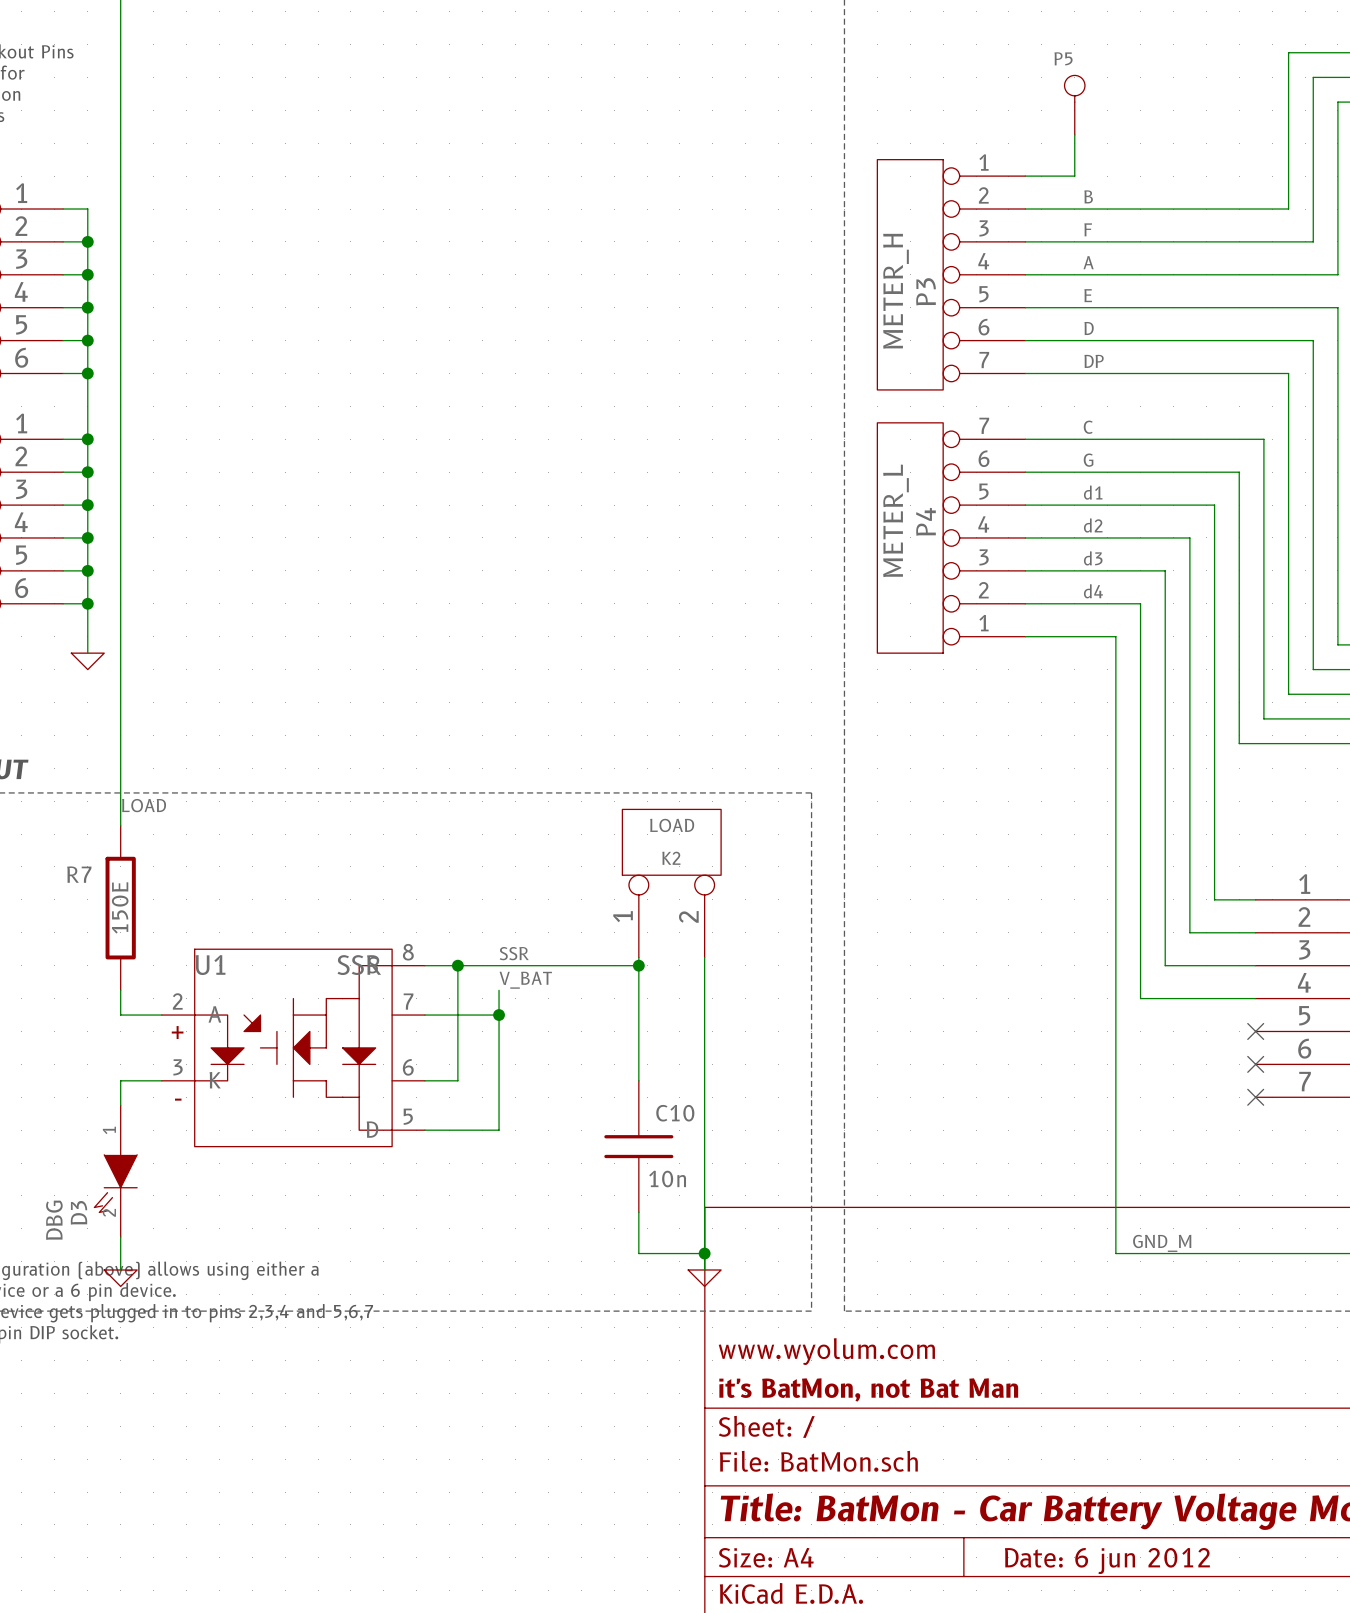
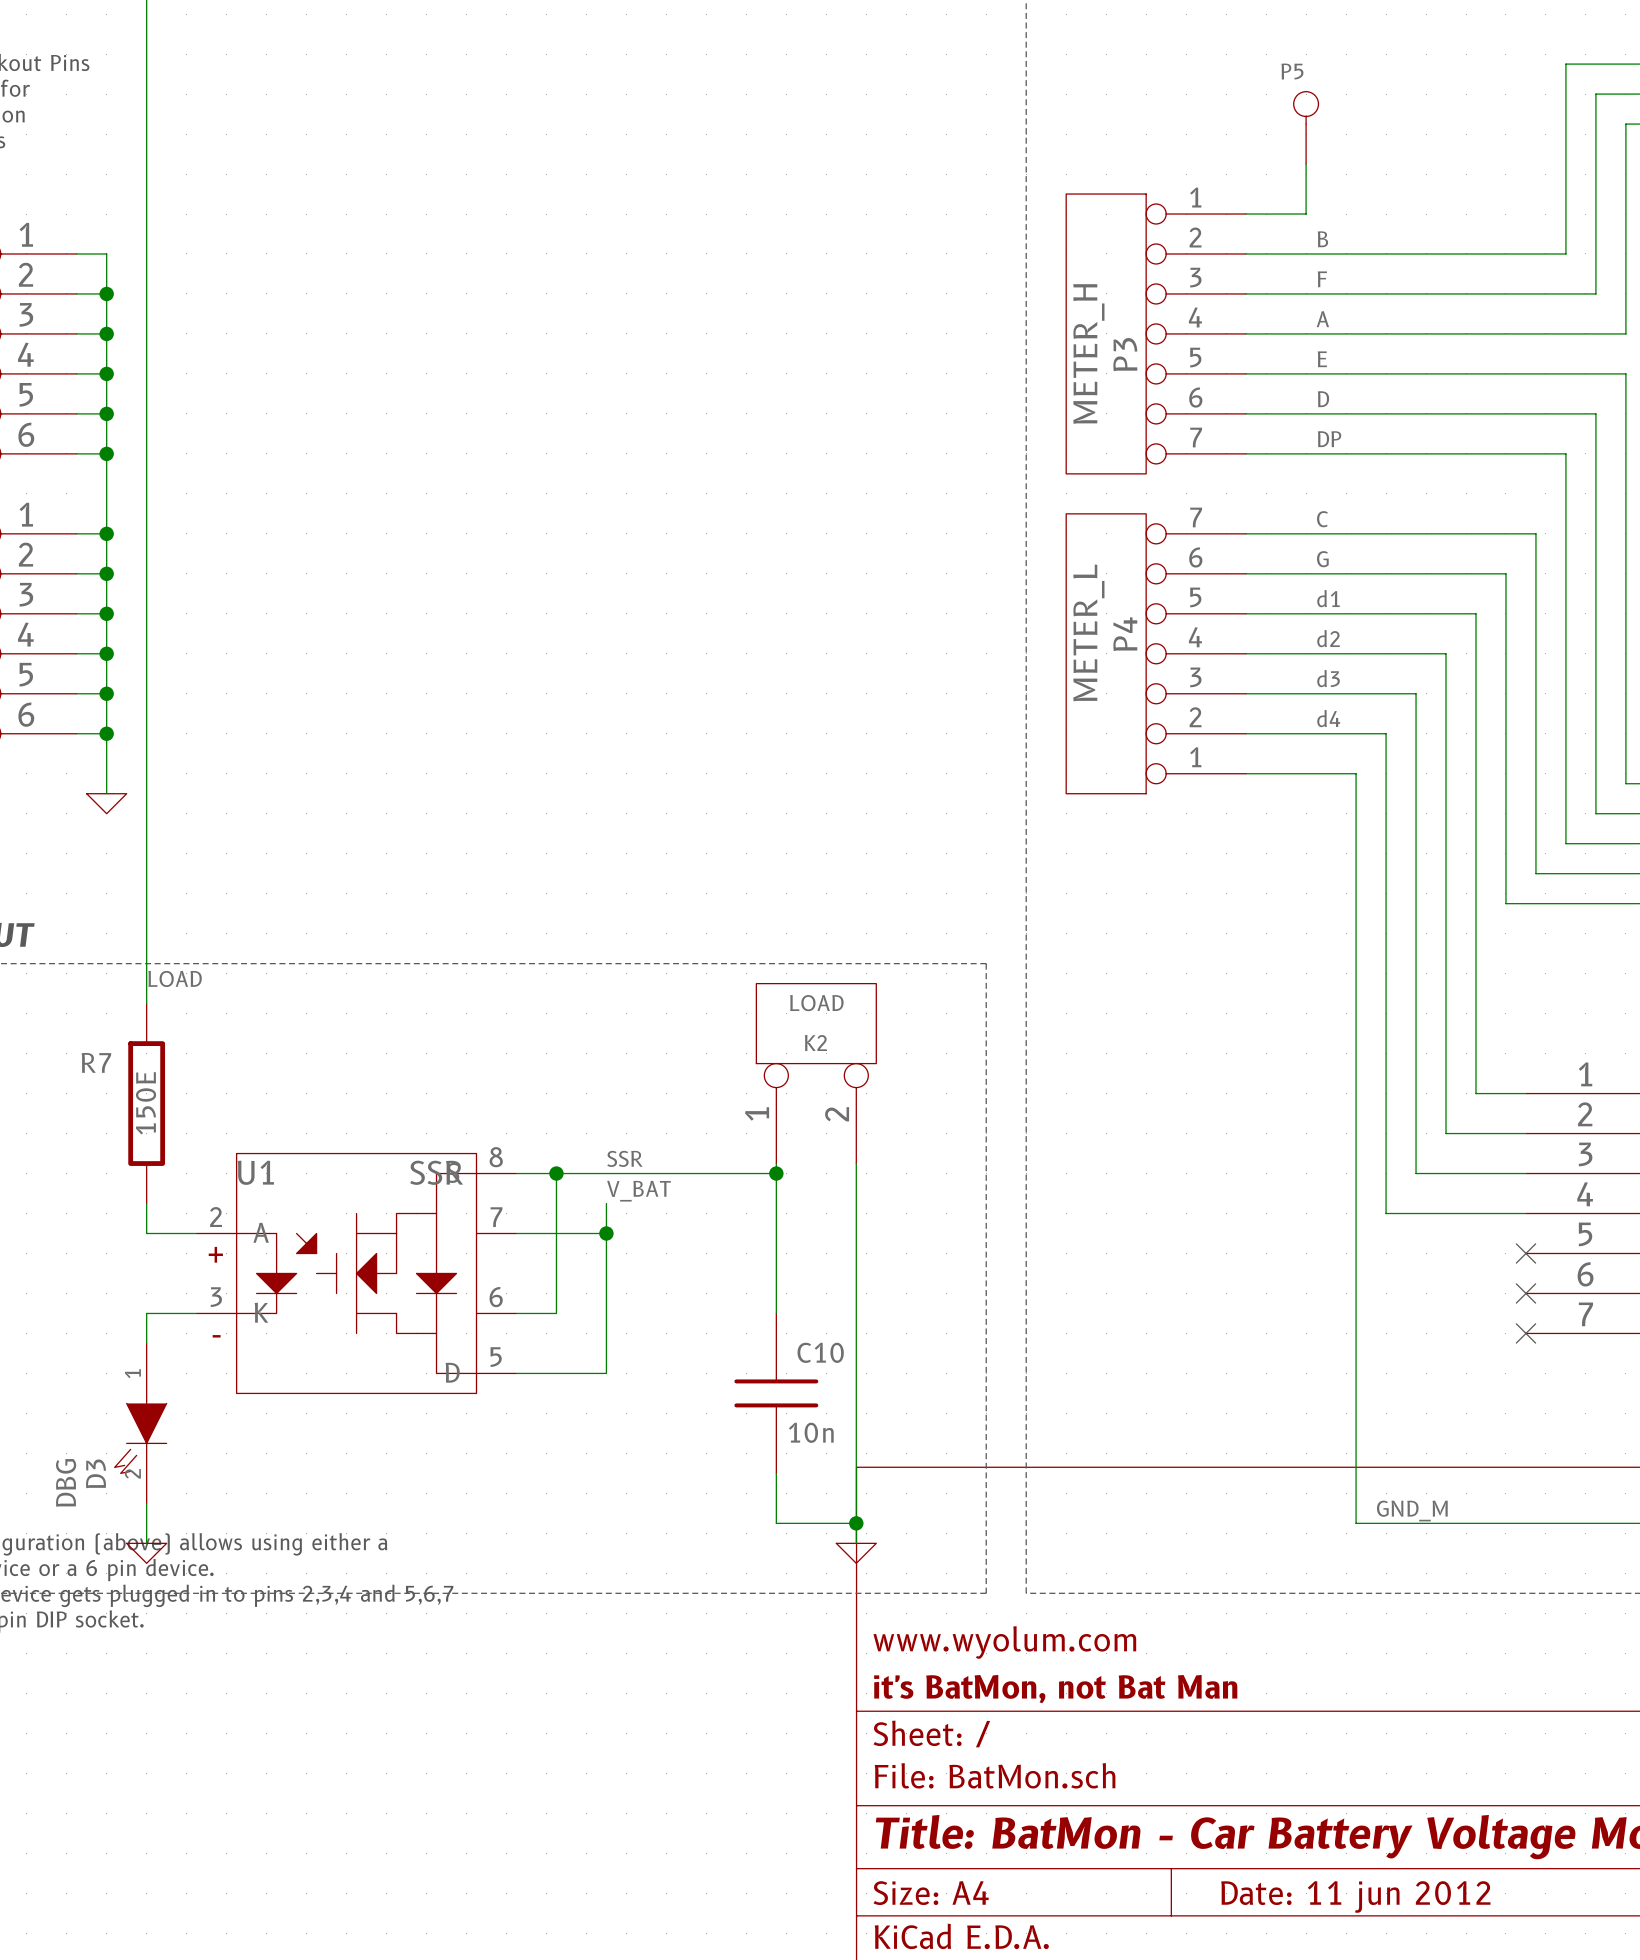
title block: Date: 6 jun 2012 (1107, 1560) -> Date: 11 jun 2012 (1355, 1896)

